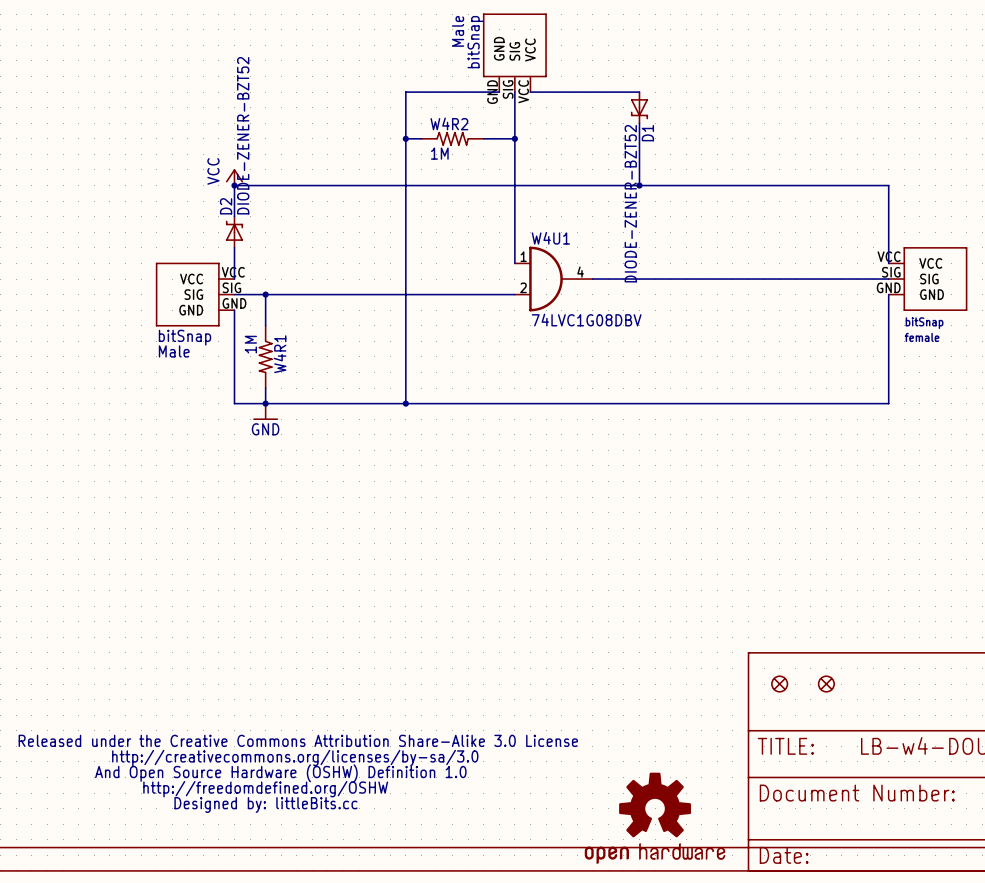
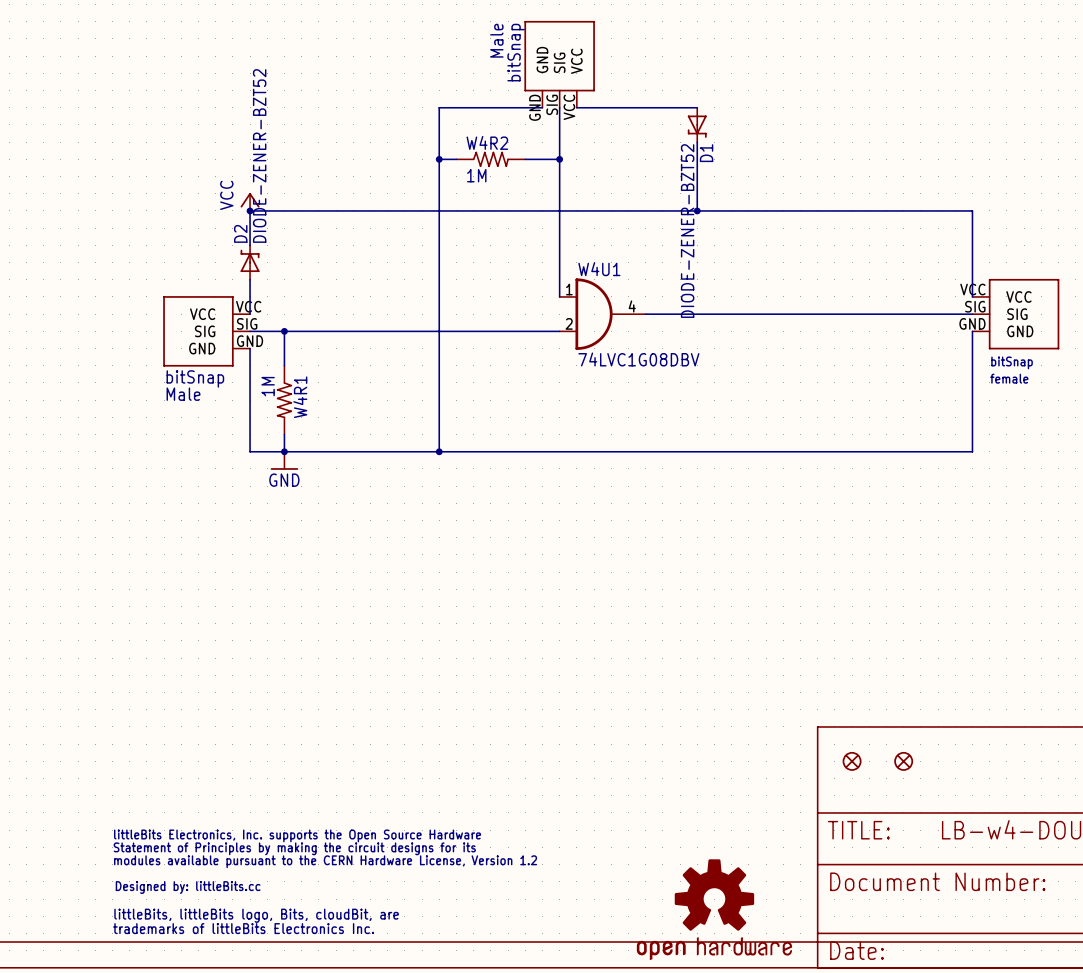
part: (298, 773) -> none
part: none -> (325, 881)

